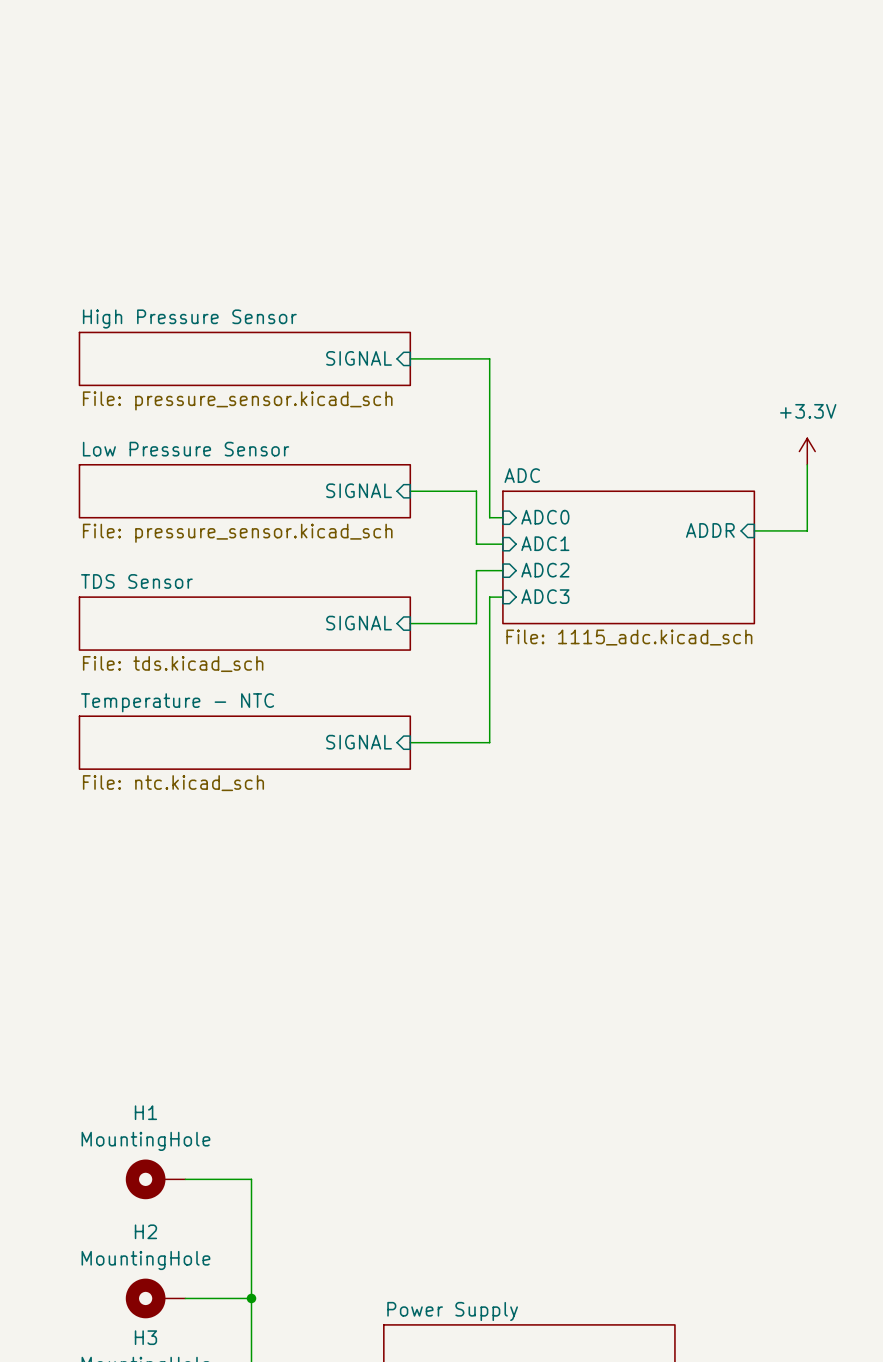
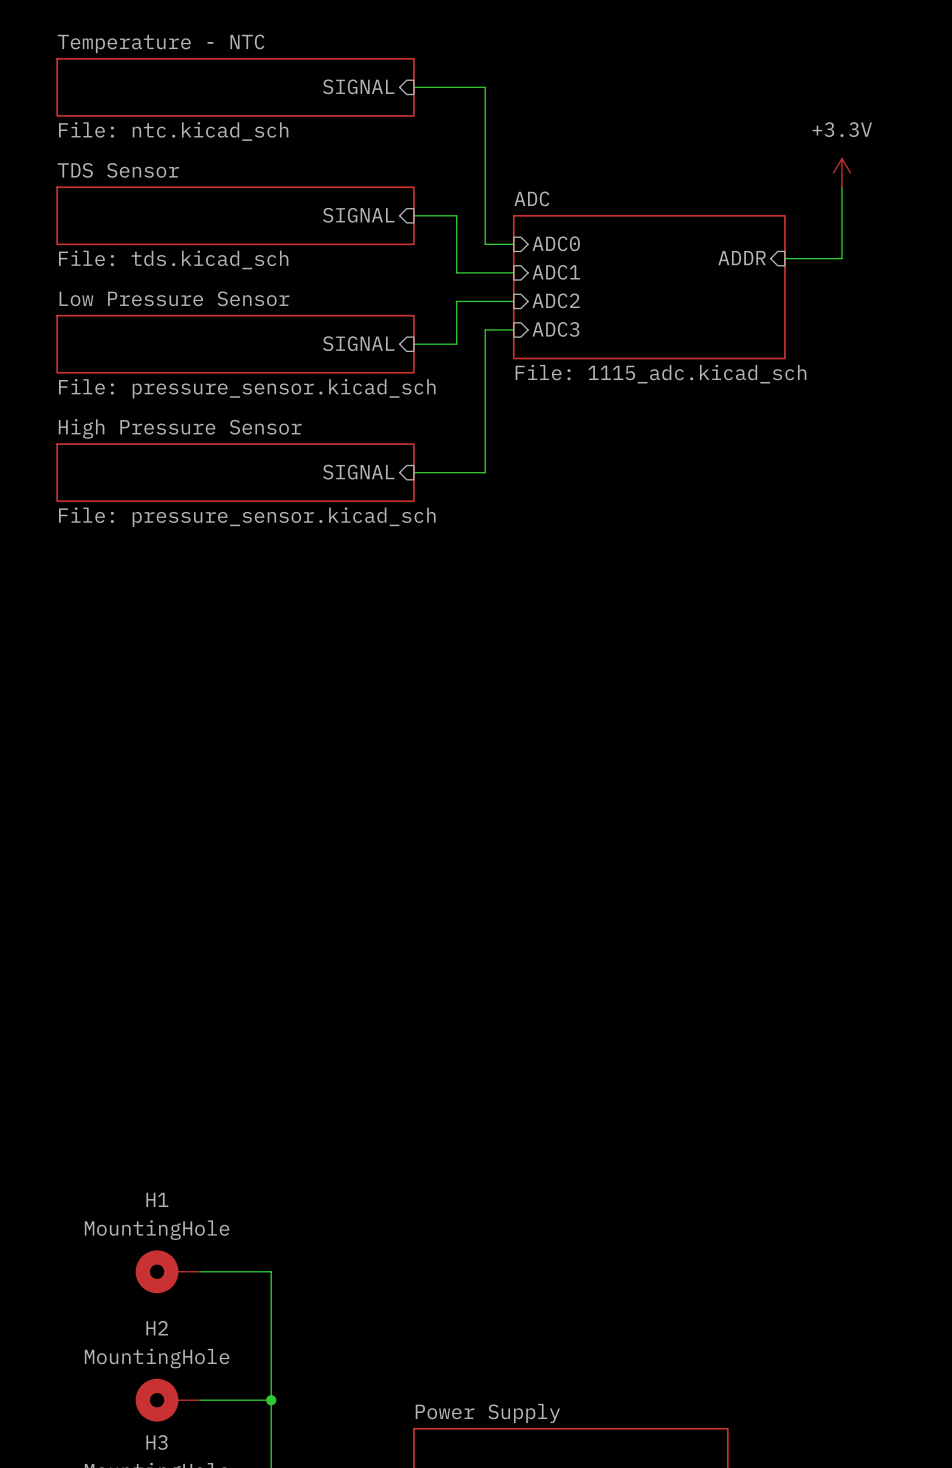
sheet pin: none -> SIGNAL (358, 86)
sheet Temperature - NTC: none -> File: ntc.kicad_sch (235, 87)
wire: none -> (413, 87) (485, 87) (485, 244) (513, 244)
power symbol: none -> +3.3V (842, 172)
wire: none -> (842, 187) (842, 258) (784, 258)
sheet pin: none -> SIGNAL (358, 215)
sheet TDS Sensor: none -> File: tds.kicad_sch (235, 215)
wire: none -> (413, 215) (456, 215) (456, 272) (513, 272)
sheet pin: none -> ADC0 (556, 243)
sheet pin: none -> ADDR (742, 258)
sheet pin: none -> ADC1 (556, 272)
sheet ADC: none -> File: 1115_adc.kicad_sch (649, 287)
wire: none -> (513, 301) (456, 301) (456, 344) (413, 344)
sheet pin: none -> ADC2 (556, 300)
wire: none -> (513, 329) (485, 329) (485, 472) (413, 472)
sheet pin: none -> ADC3 (555, 329)
sheet pin: none -> SIGNAL (358, 343)
sheet High Pressure Sensor position: (244, 358) -> (235, 472)
sheet pin: SIGNAL (359, 358) -> none
wire: (410, 358) (489, 358) (489, 517) (502, 517) -> none
sheet pin: none -> SIGNAL (358, 472)
power symbol: +3.3V (807, 451) -> none
wire: (807, 464) (807, 530) (754, 530) -> none
sheet pin: SIGNAL (359, 490) -> none
sheet Low Pressure Sensor position: (244, 491) -> (235, 344)
wire: (410, 491) (476, 491) (476, 544) (502, 544) -> none
sheet pin: ADC0 (545, 517) -> none
sheet pin: ADDR (710, 530) -> none
sheet pin: ADC1 (545, 543) -> none
sheet ADC: File: 1115_adc.kicad_sch (628, 557) -> none
wire: (502, 570) (476, 570) (476, 623) (410, 623) -> none
sheet pin: ADC2 (545, 570) -> none
sheet pin: ADC3 (545, 596) -> none
wire: (502, 597) (489, 597) (489, 742) (410, 742) -> none
sheet TDS Sensor: File: tds.kicad_sch (244, 623) -> none
sheet pin: SIGNAL (359, 623) -> none
sheet Temperature - NTC: File: ntc.kicad_sch (244, 742) -> none
sheet pin: SIGNAL (359, 742) -> none

